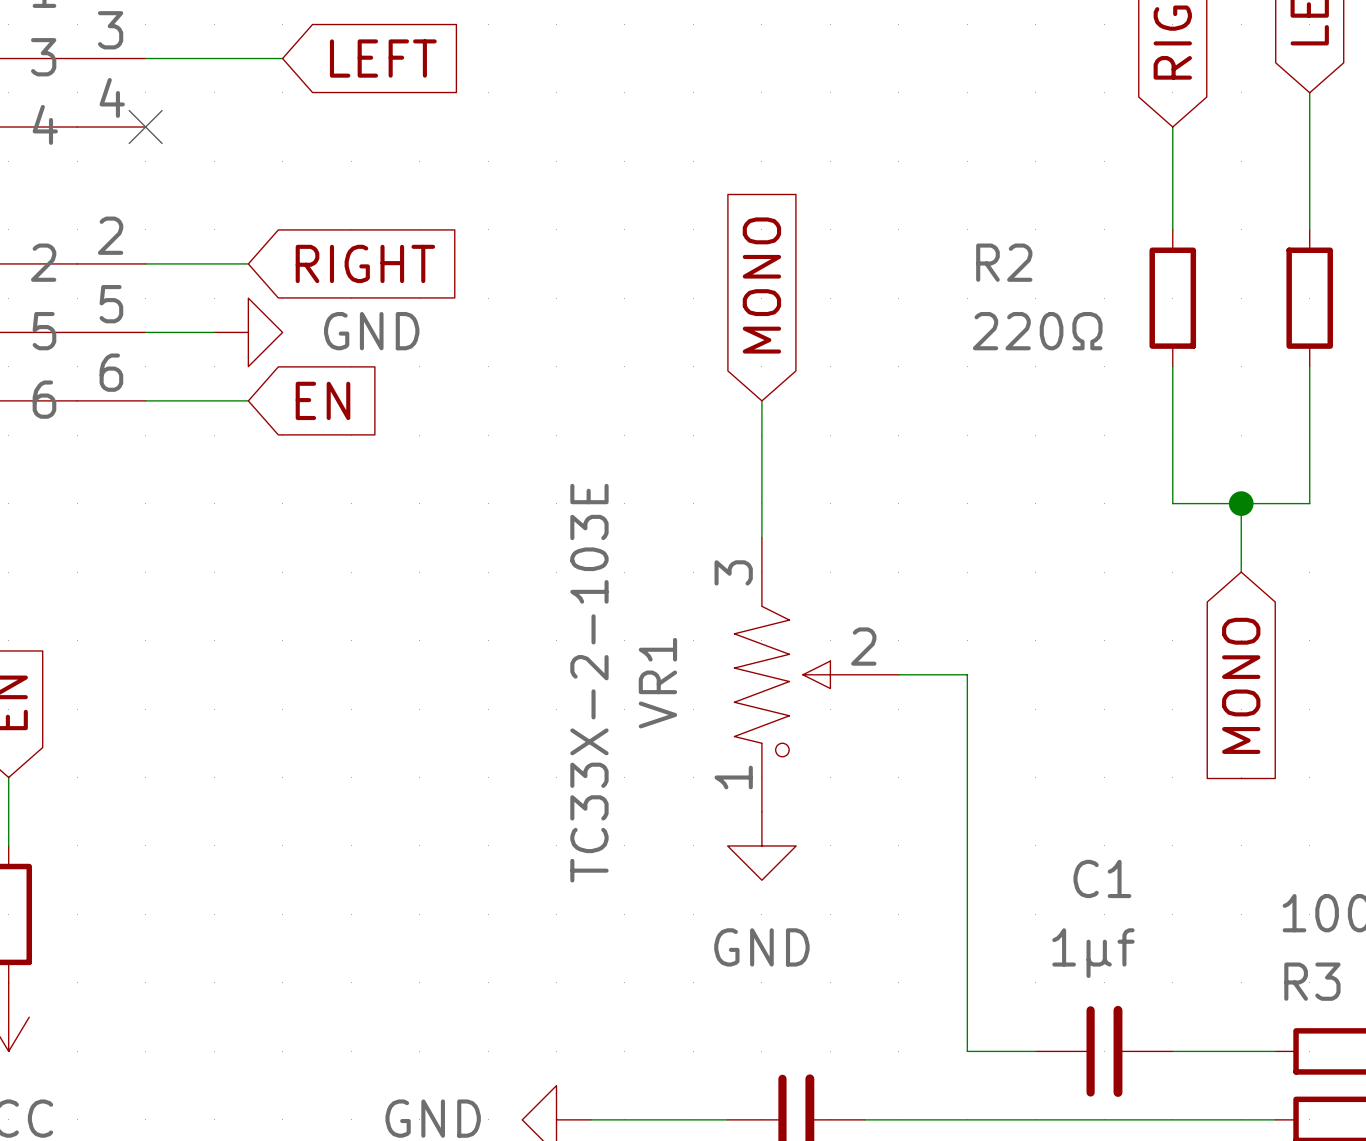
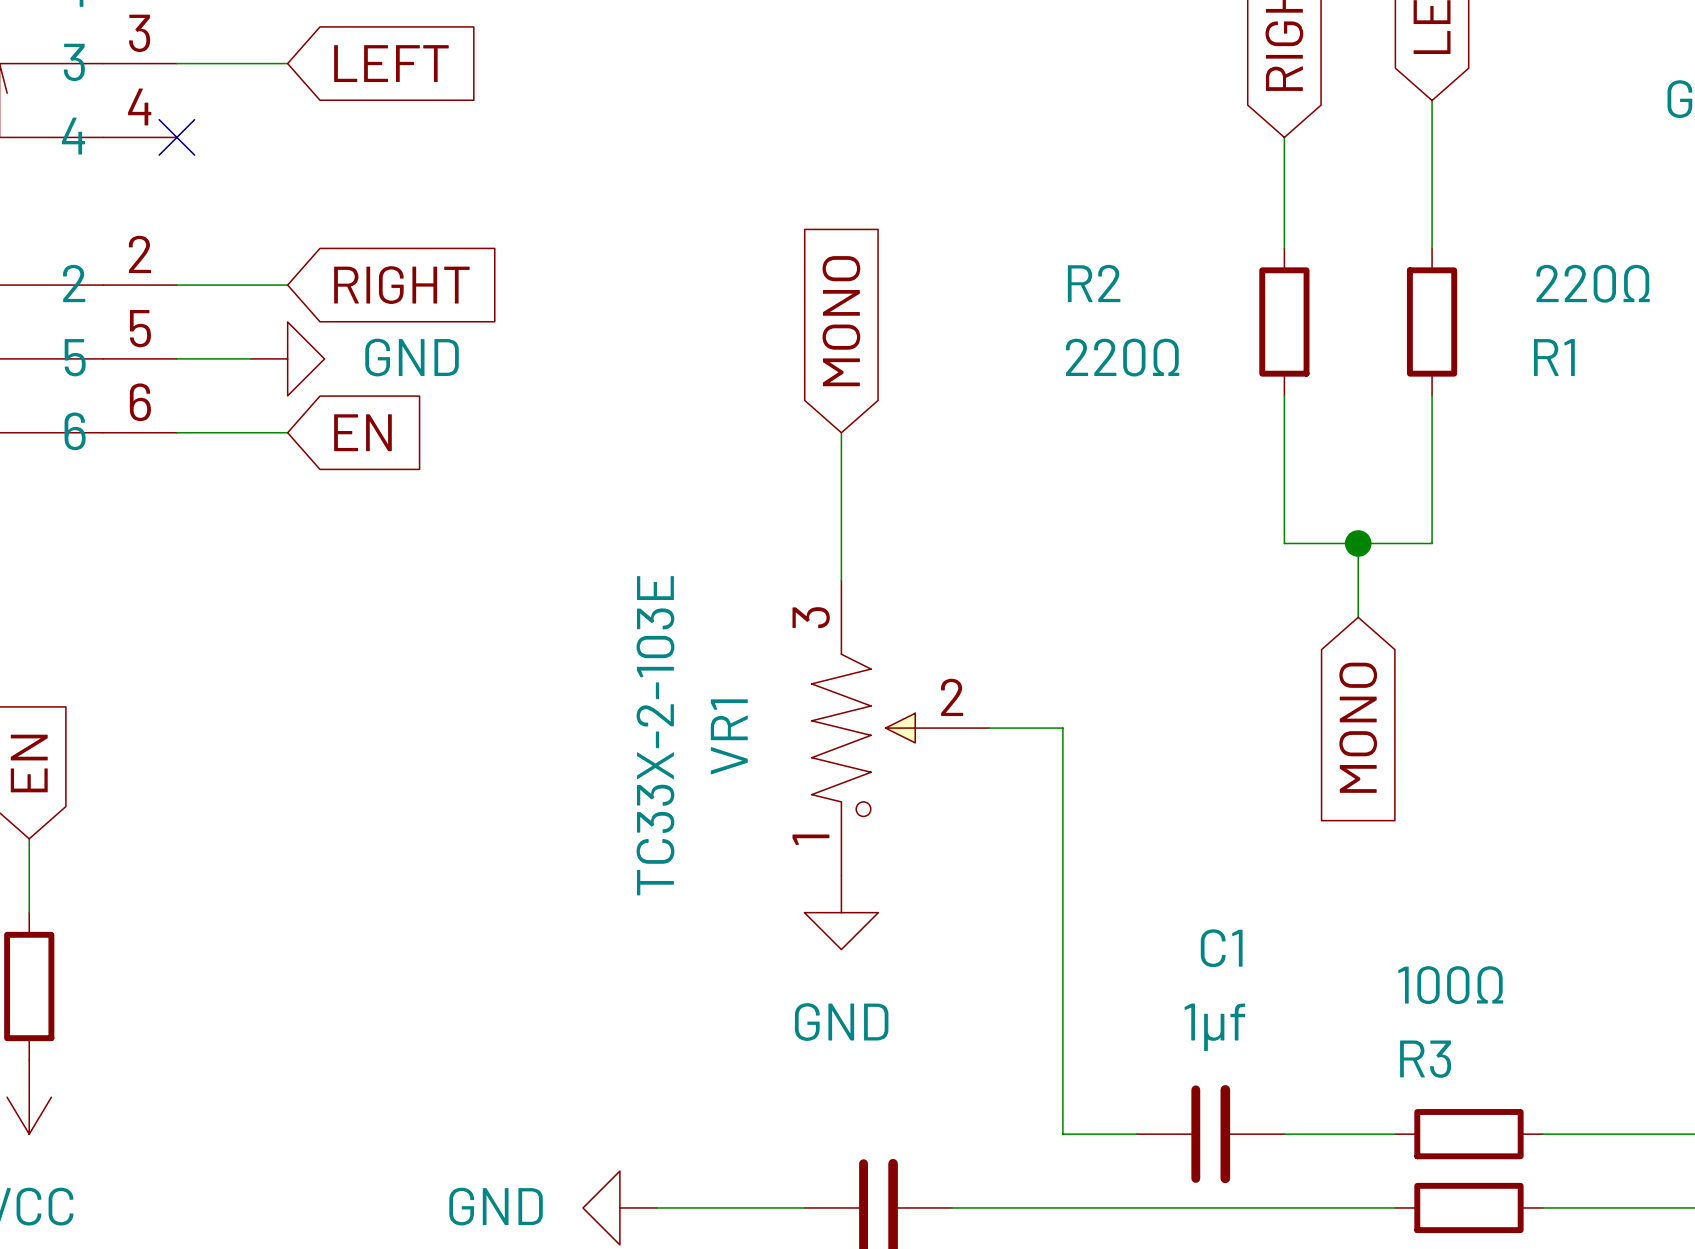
wire: (248, 58) (282, 58) -> none
global label position: LEFT (383, 58) -> LEFT (391, 63)

